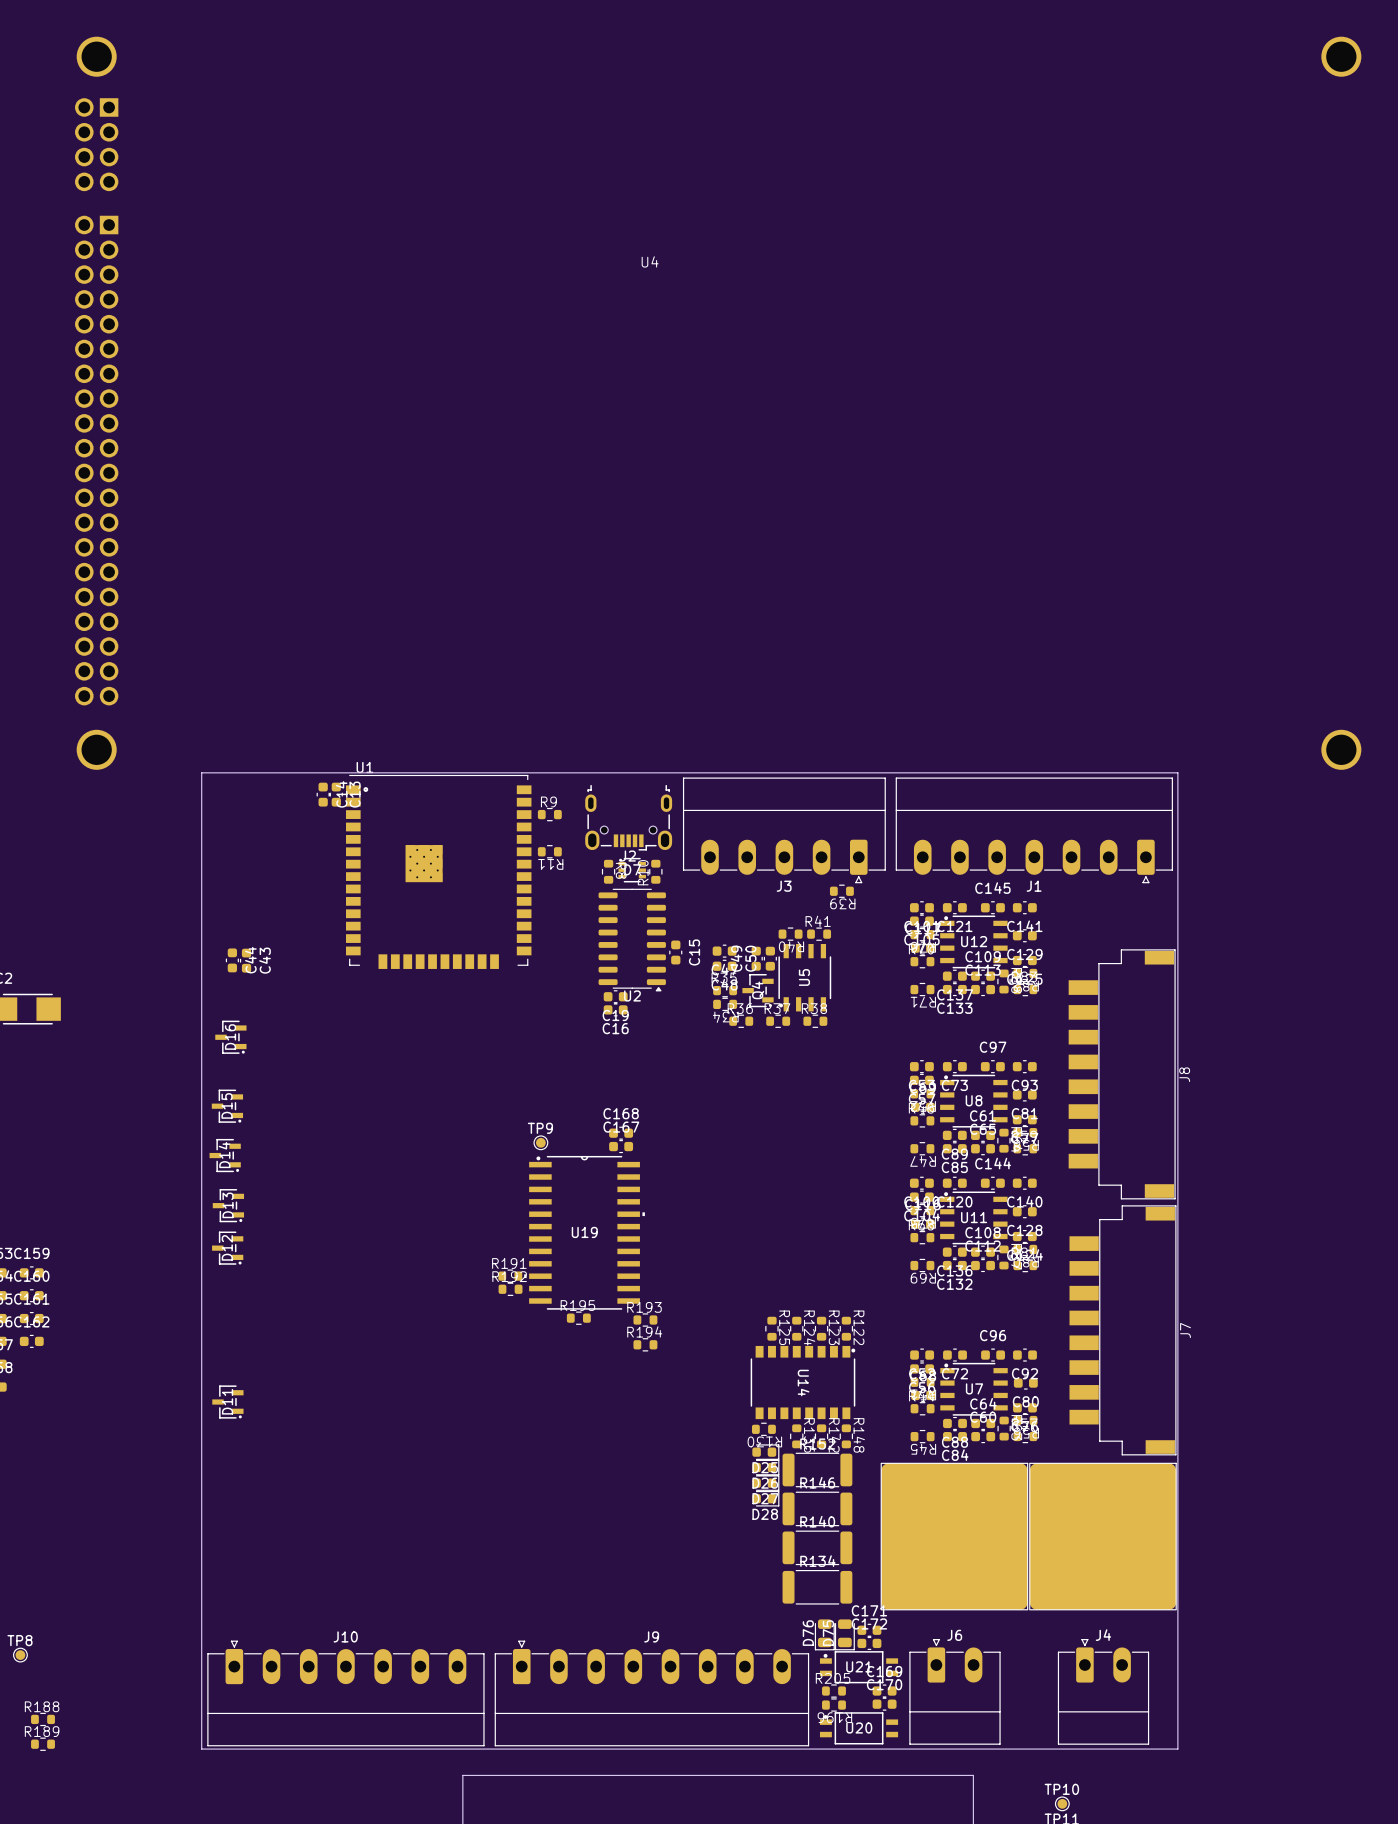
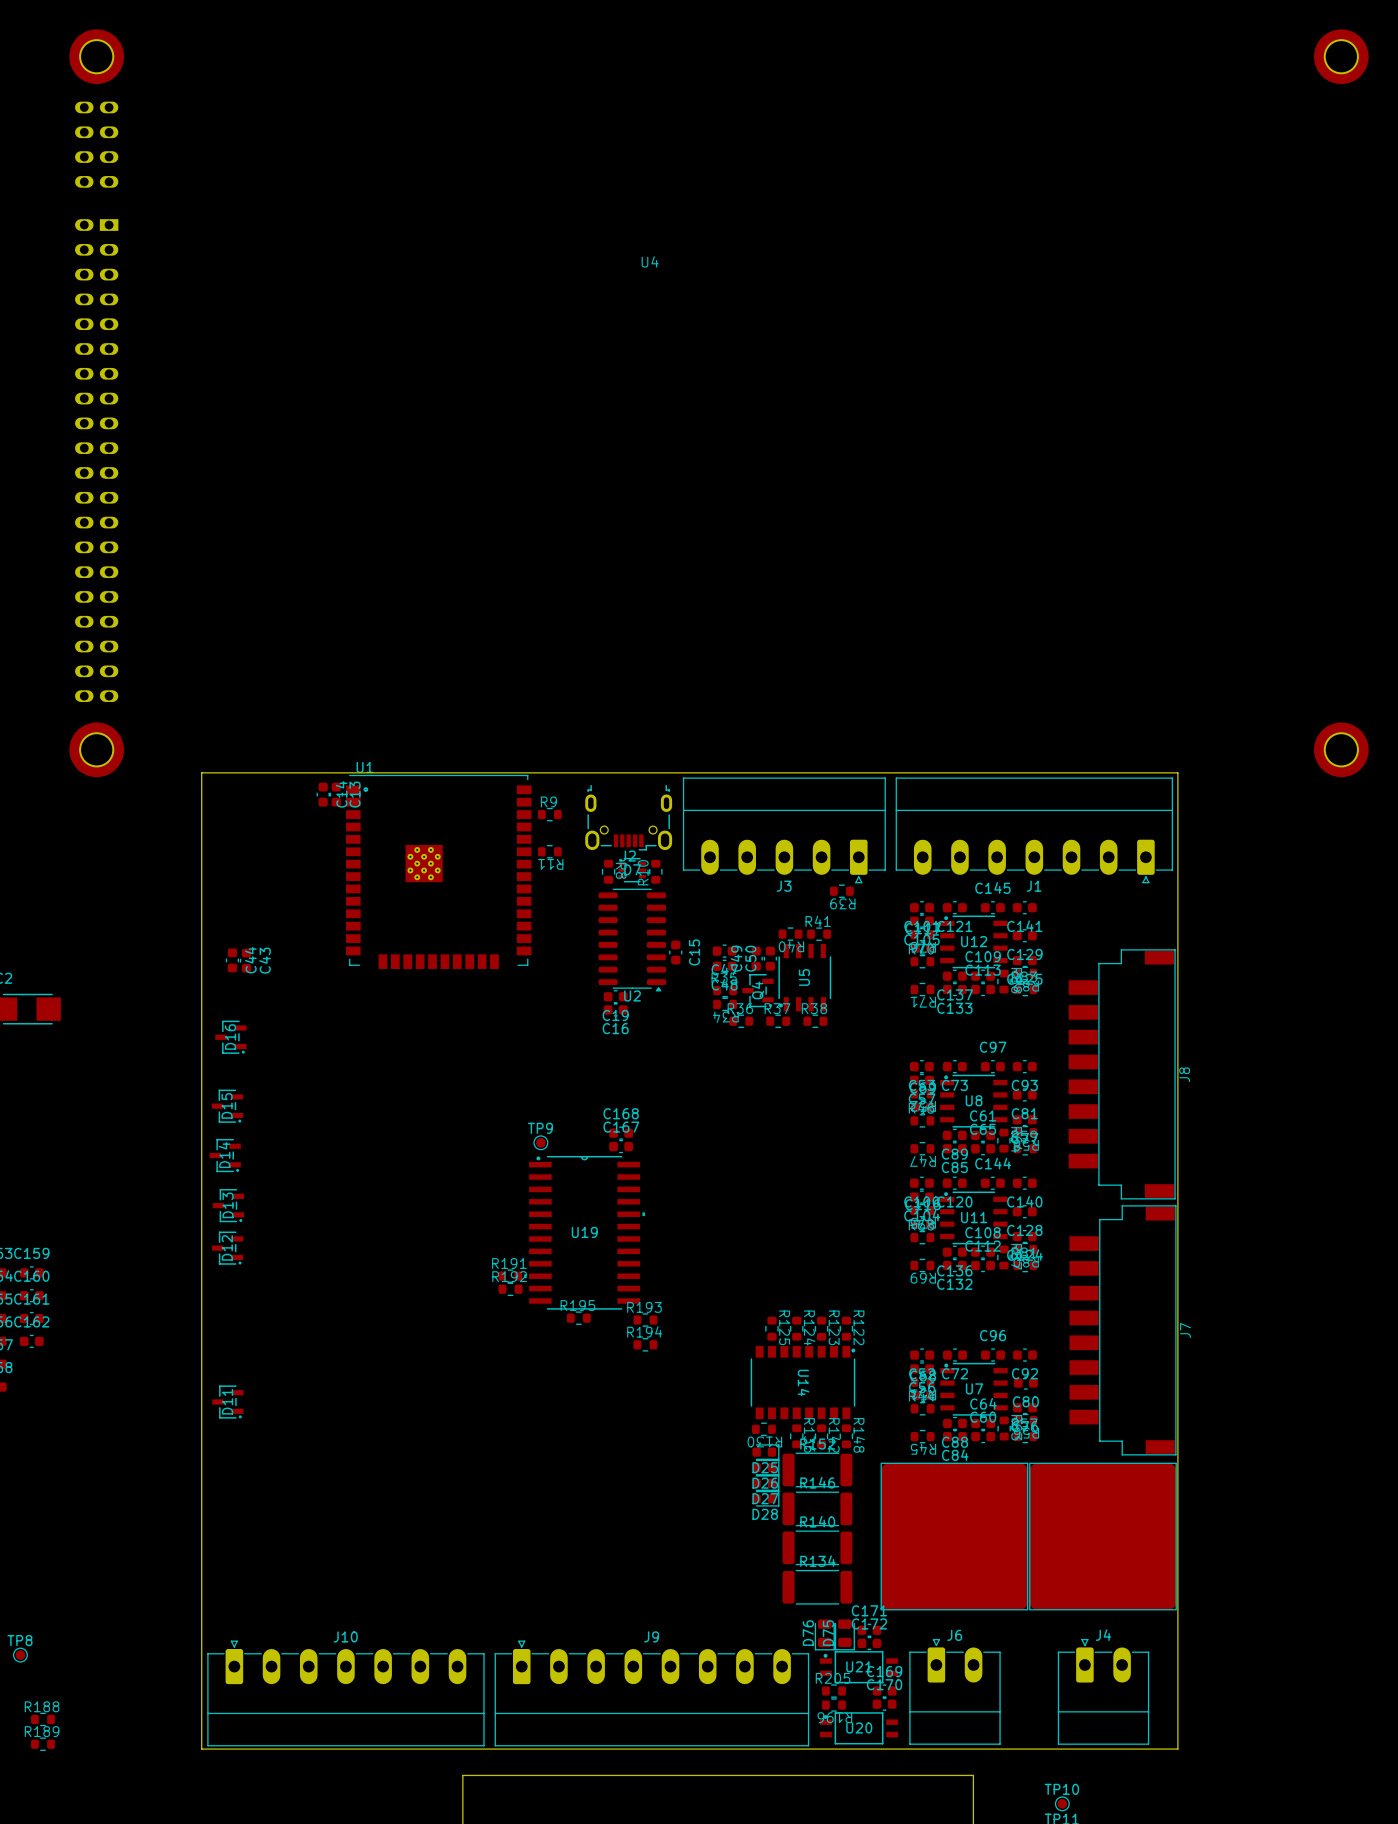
U4 footprint: [75, 36, 1362, 770] -> [69, 29, 1369, 778]

